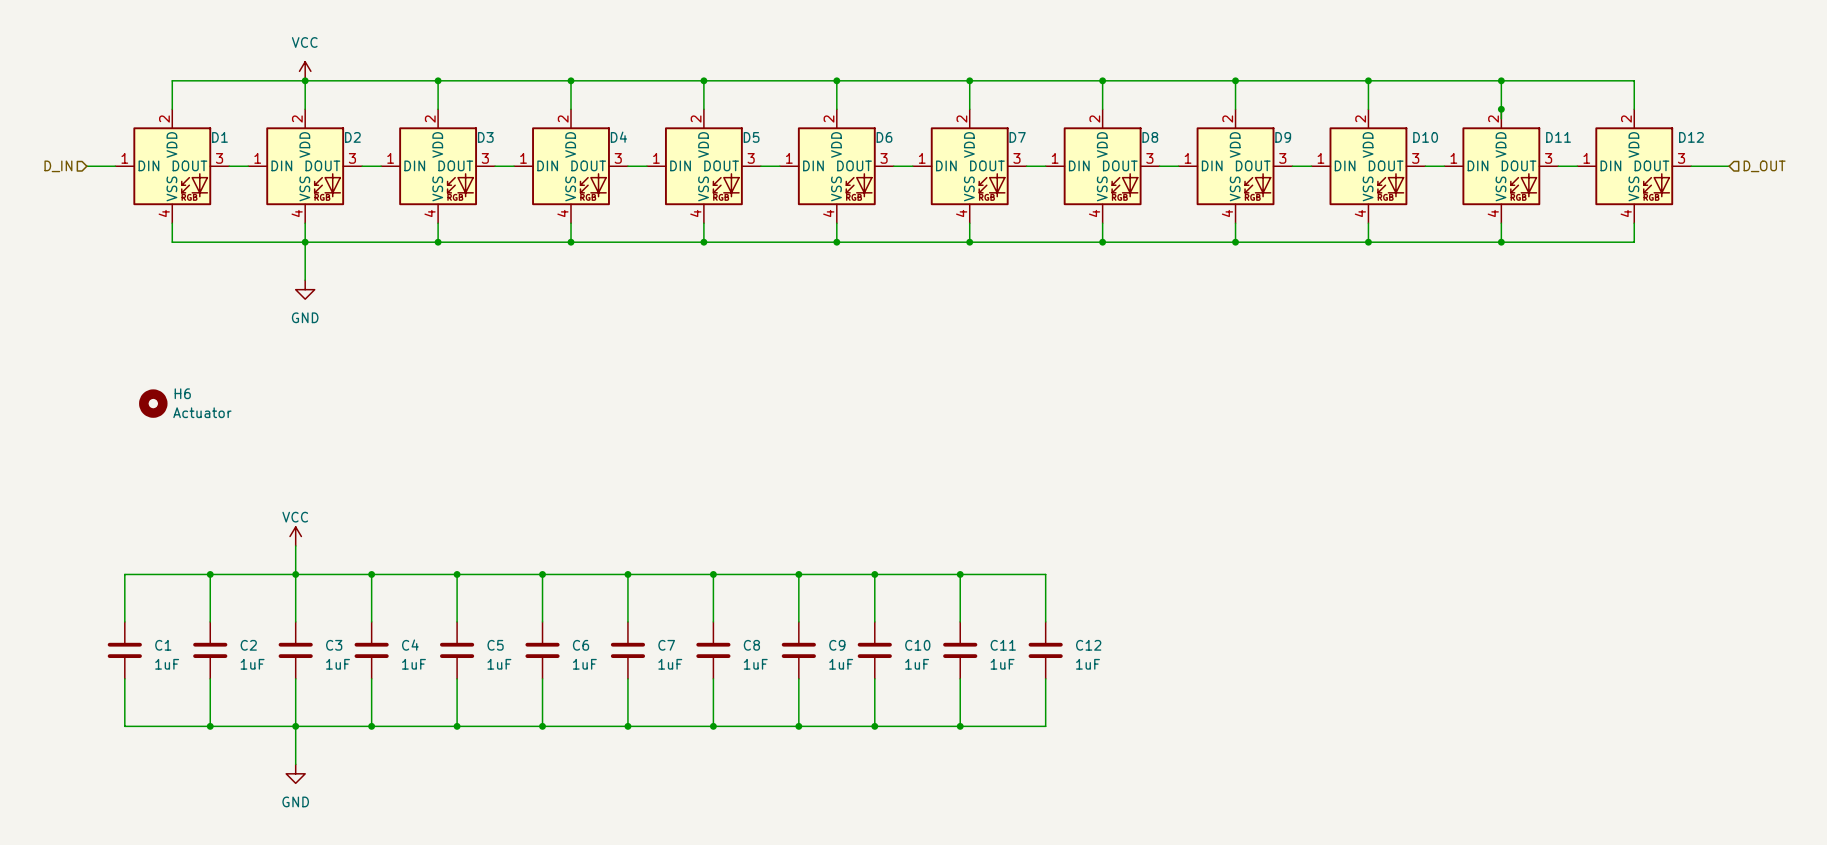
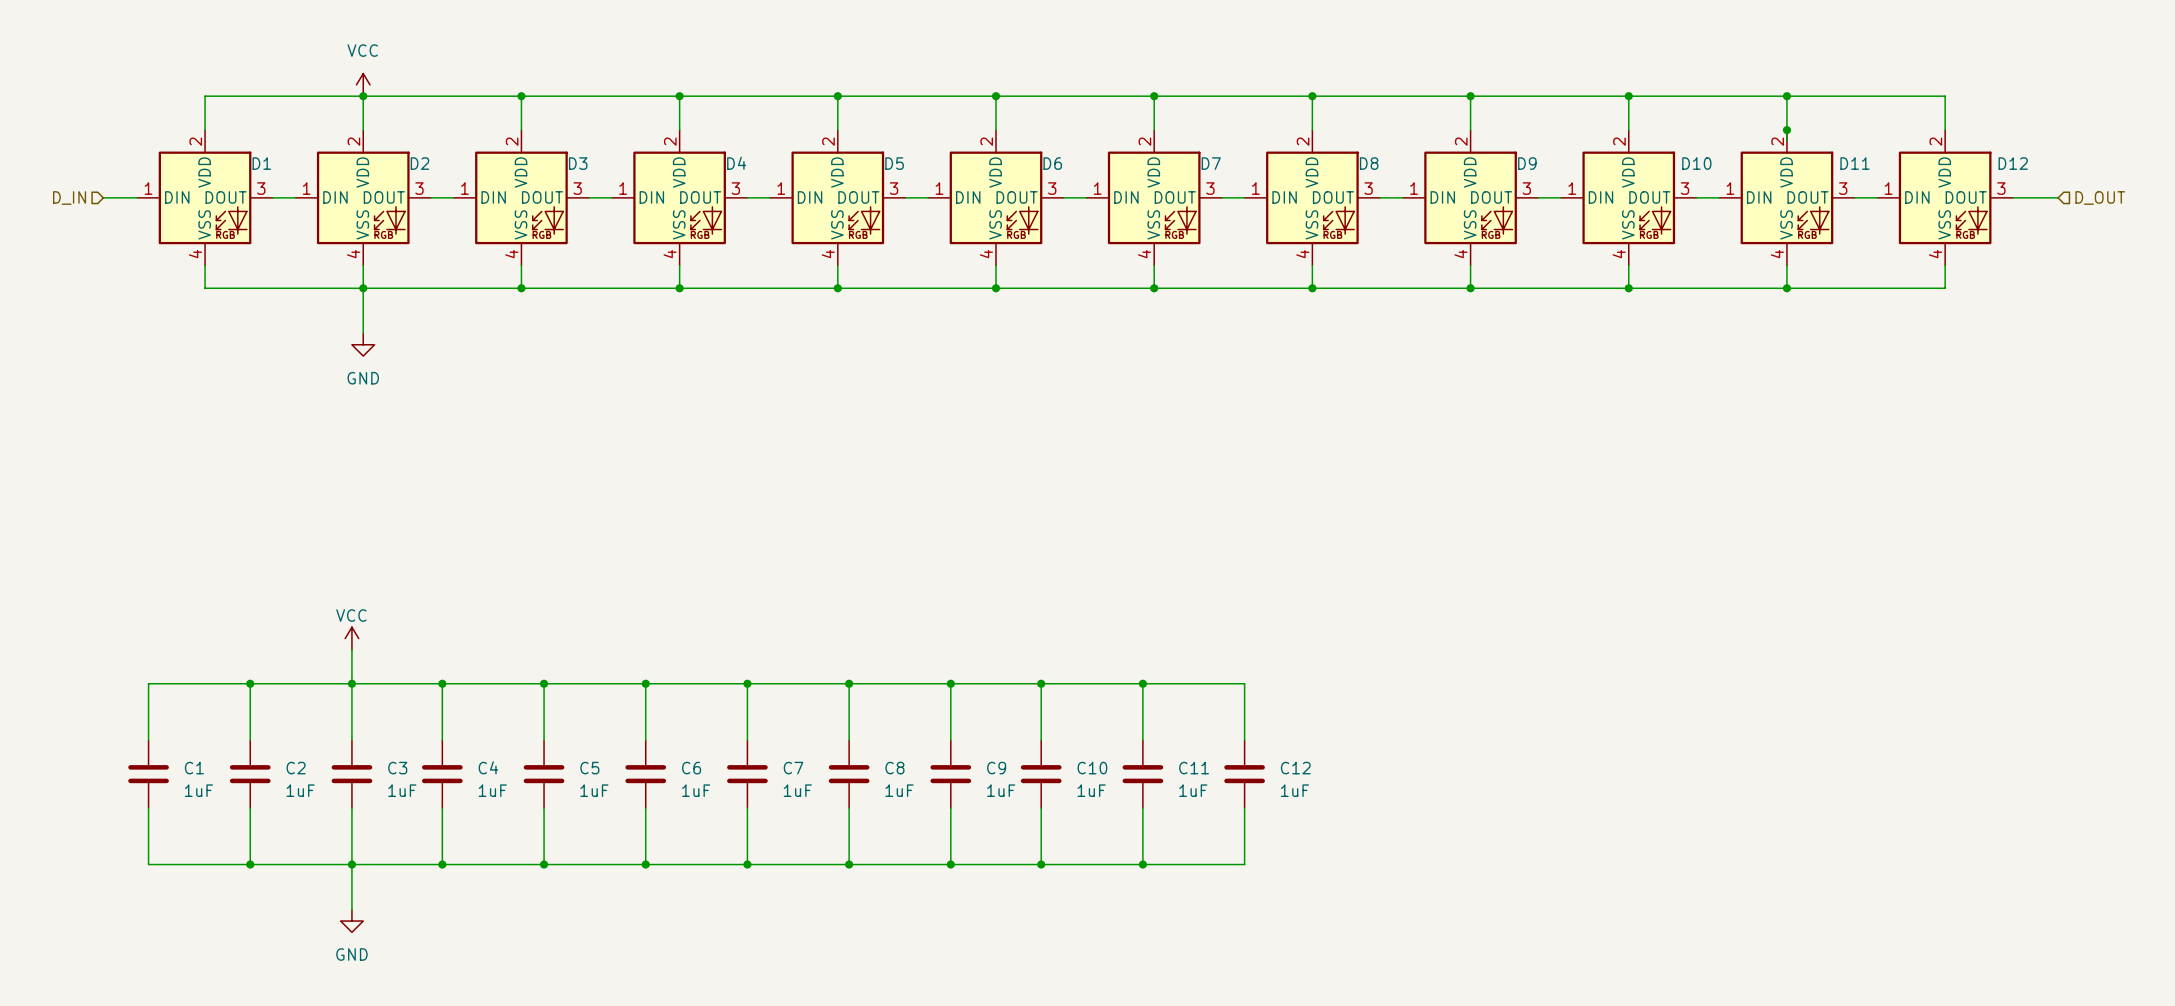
H6: Actuator (153, 403) -> none

